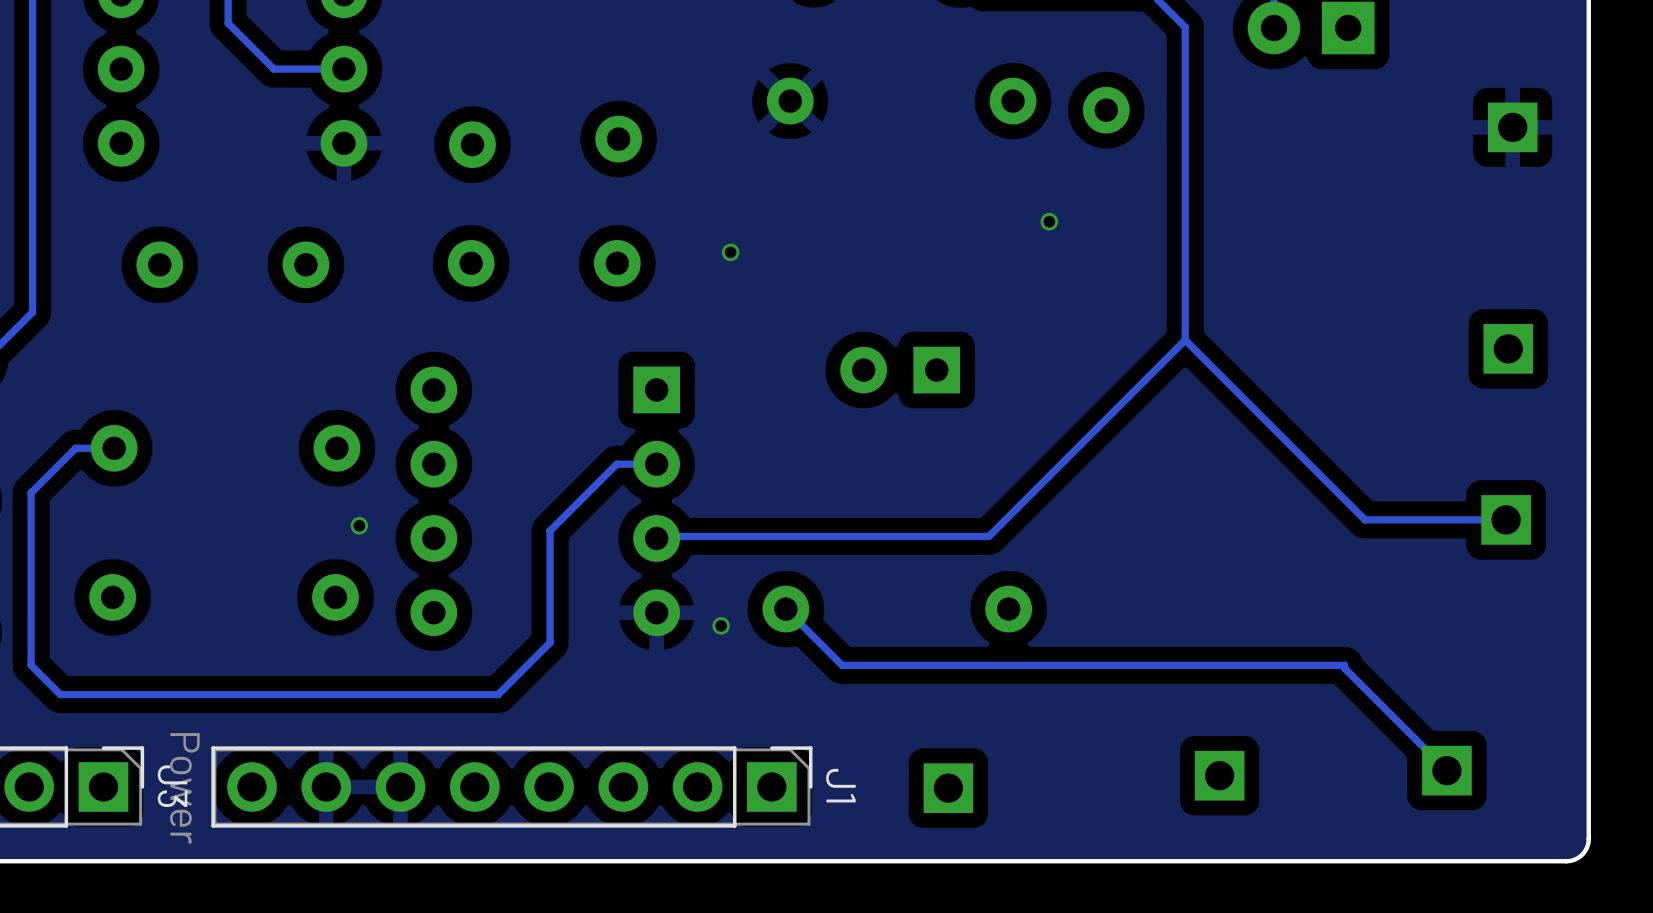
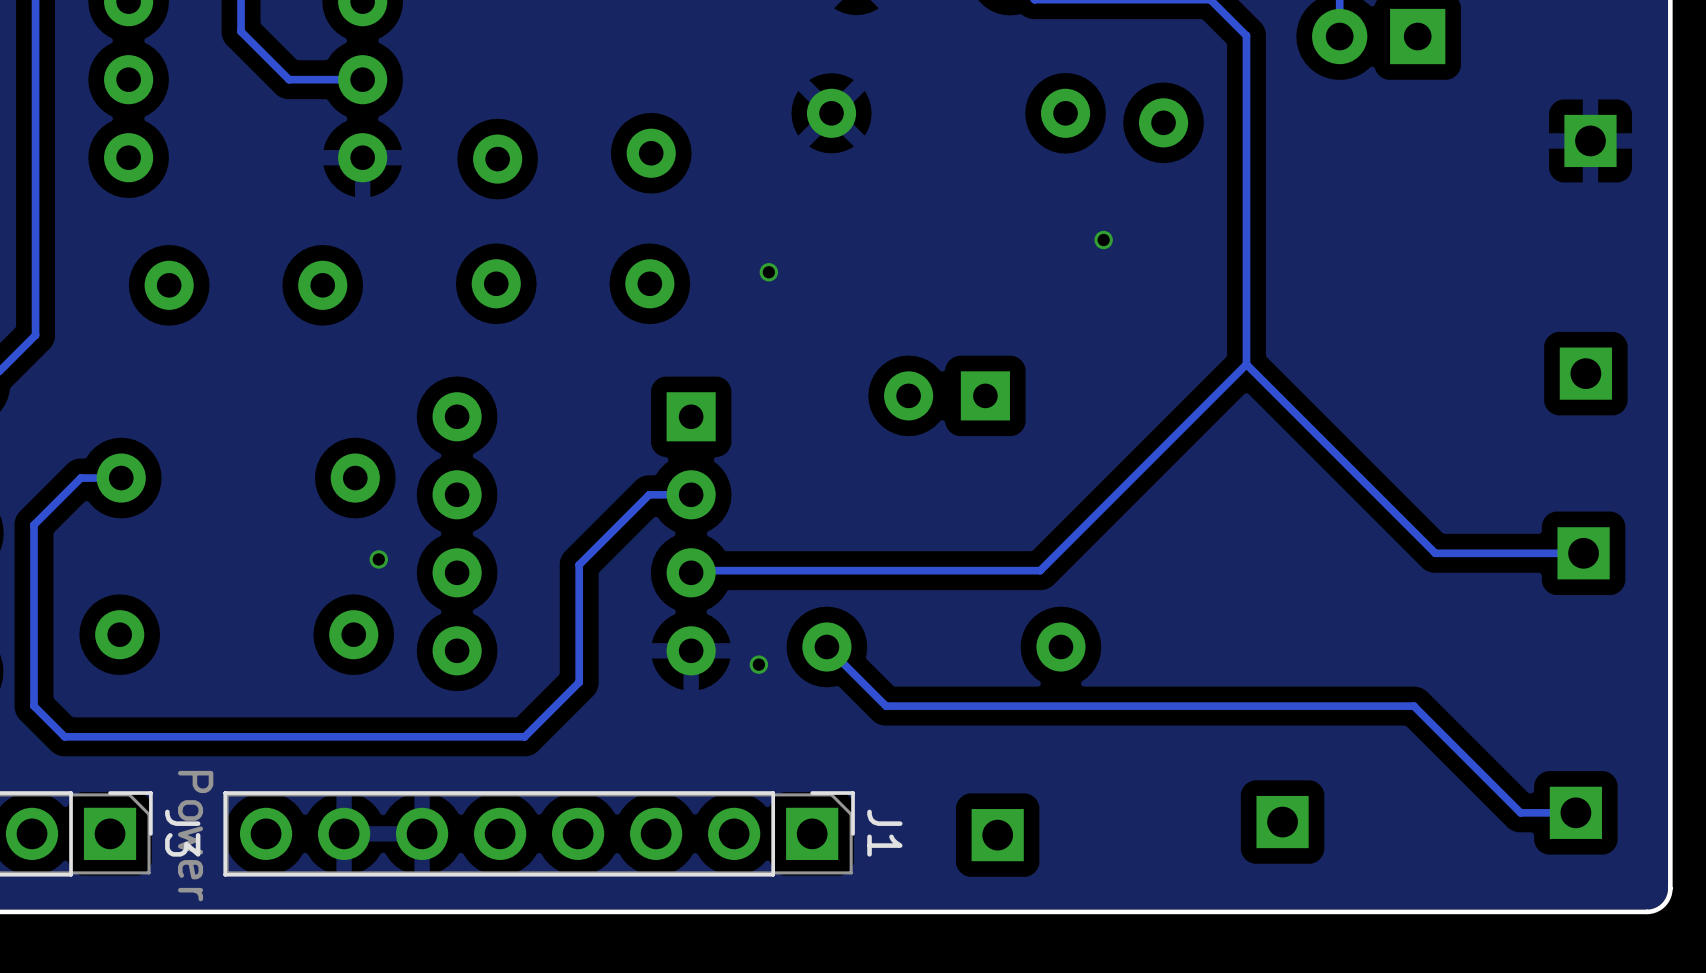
track: (1344, 665) (1344, 668) (1446, 770) -> (1413, 706) (1520, 812) (1575, 812)
part position: (1446, 770) -> (1575, 812)

